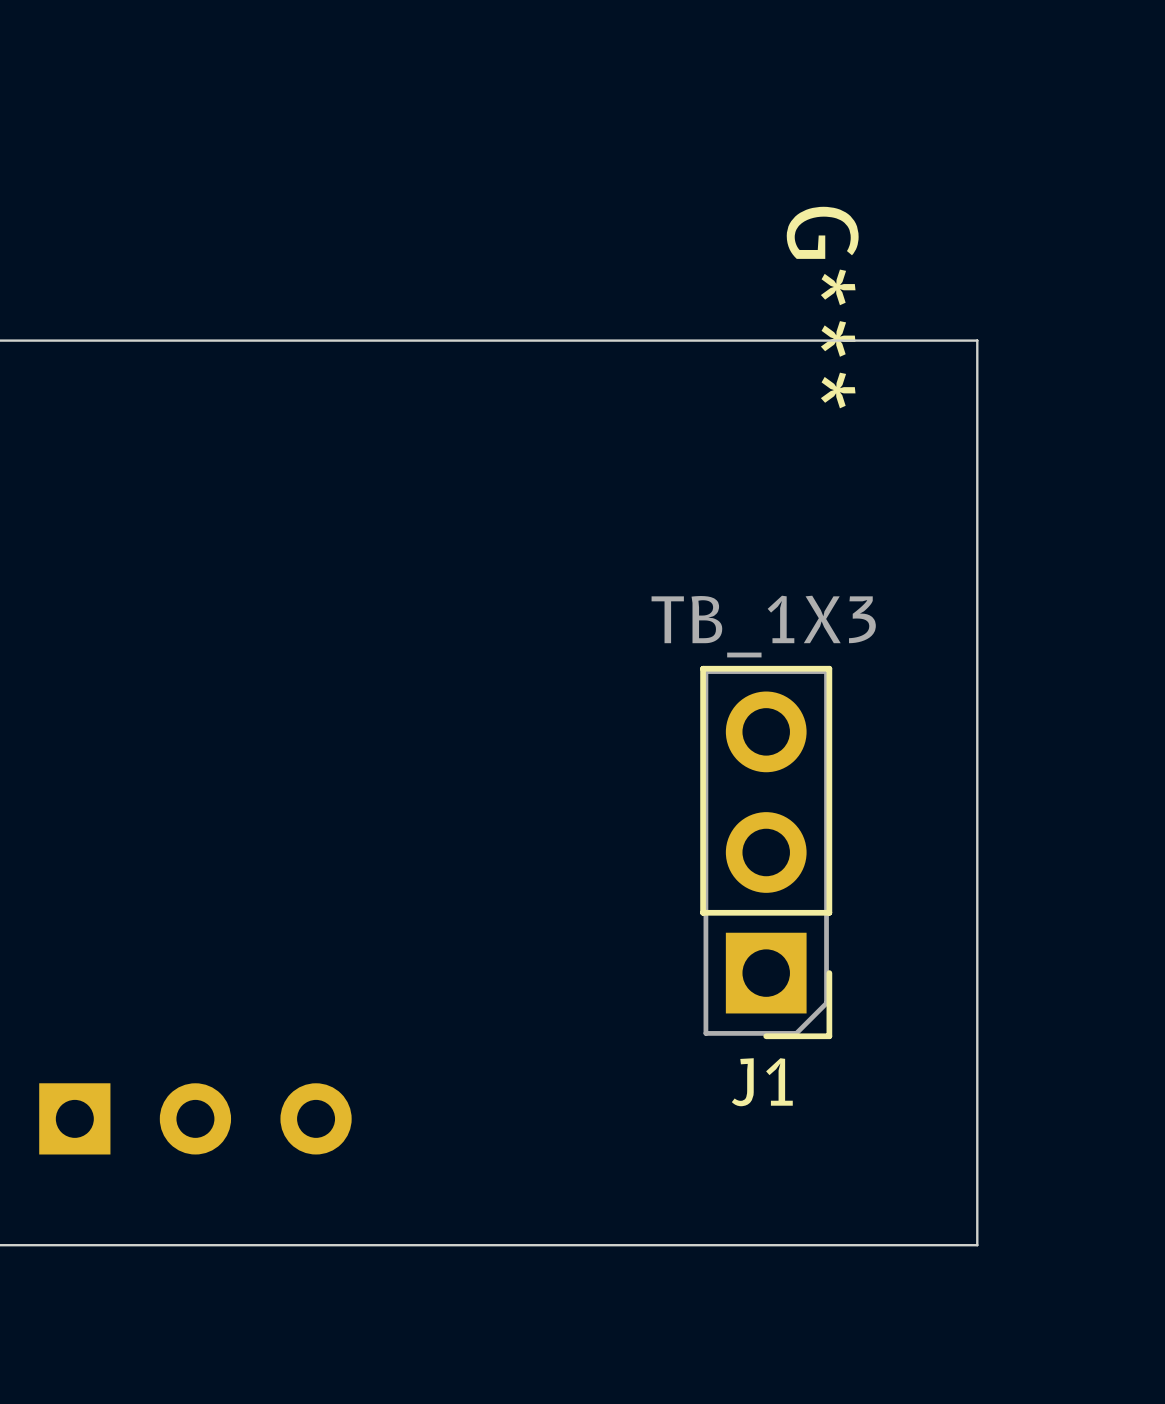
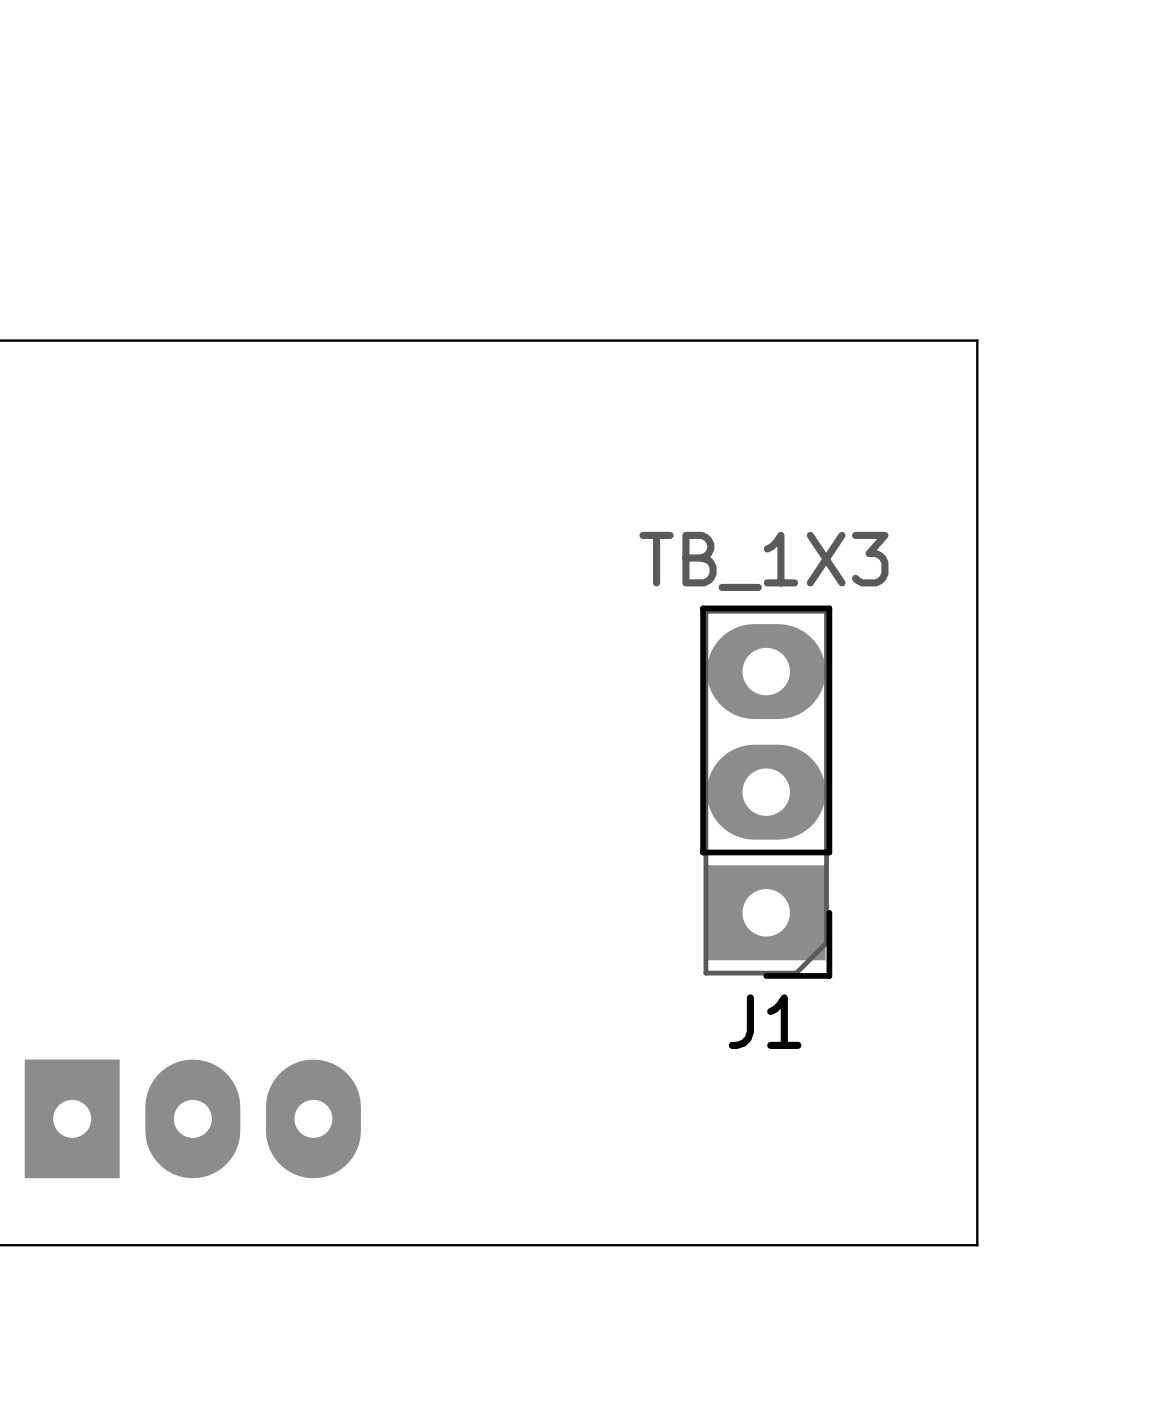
G***: (822, 307) -> none
J1 footprint: [700, 665, 833, 1040] -> [700, 605, 833, 979]
part footprint: [39, 1083, 352, 1155] -> [24, 1059, 361, 1179]

